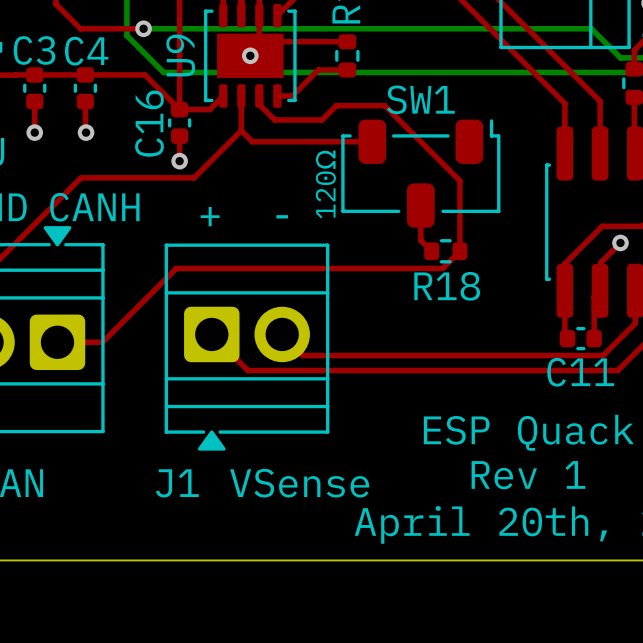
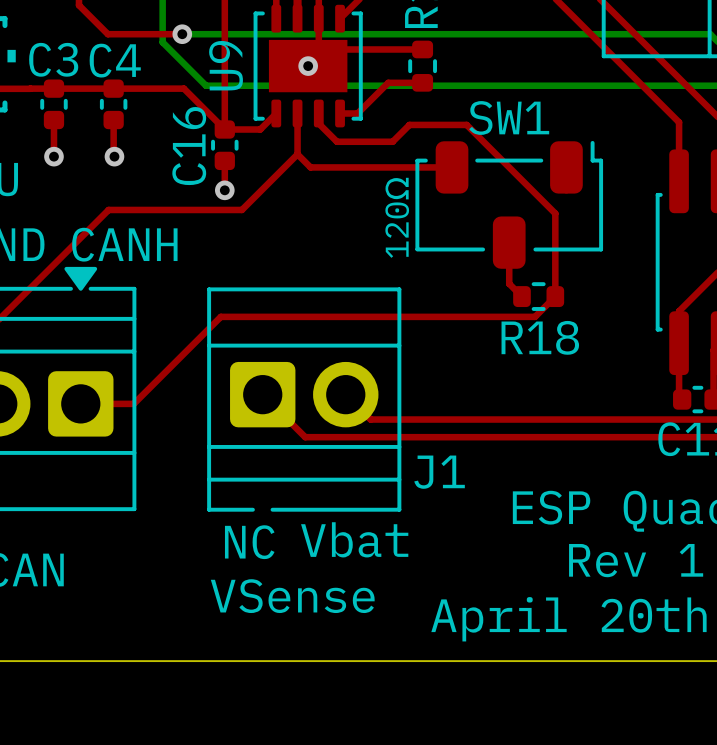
text: + (210, 216) -> none
text: - (282, 216) -> none
J1 footprint: [164, 243, 330, 451] -> [207, 287, 402, 512]
text: none -> NC (249, 542)
J1 name position: J1 (177, 483) -> J1 (439, 472)
text: VSense (299, 483) -> Vbat (354, 539)
text: none -> VSense (292, 596)

